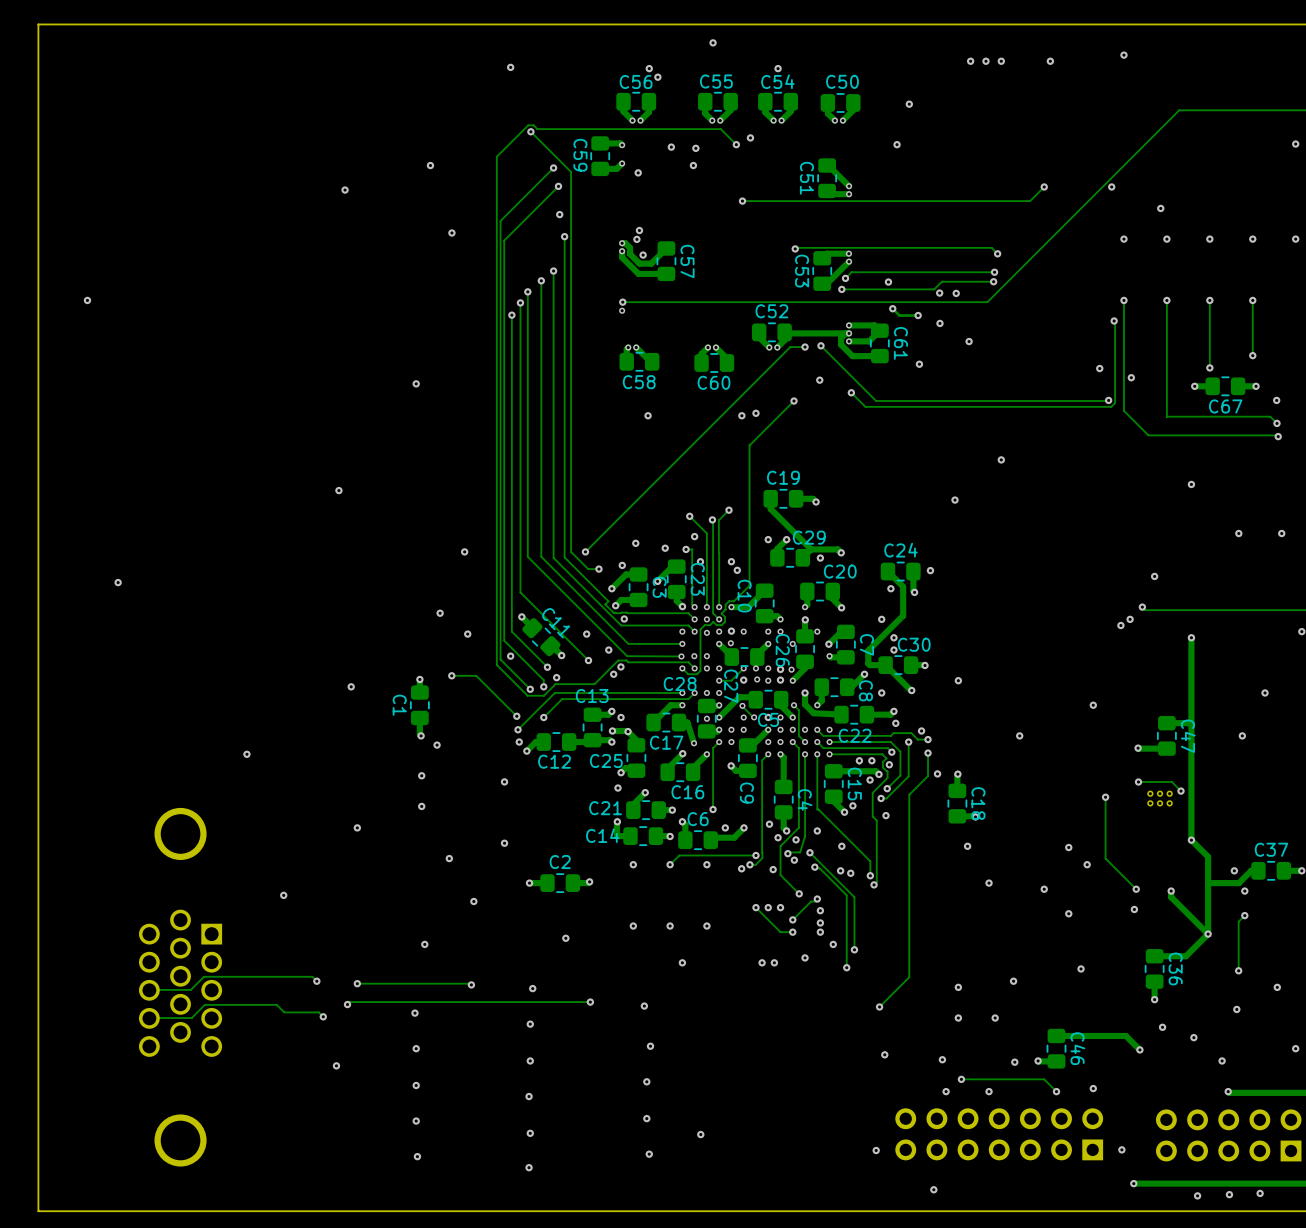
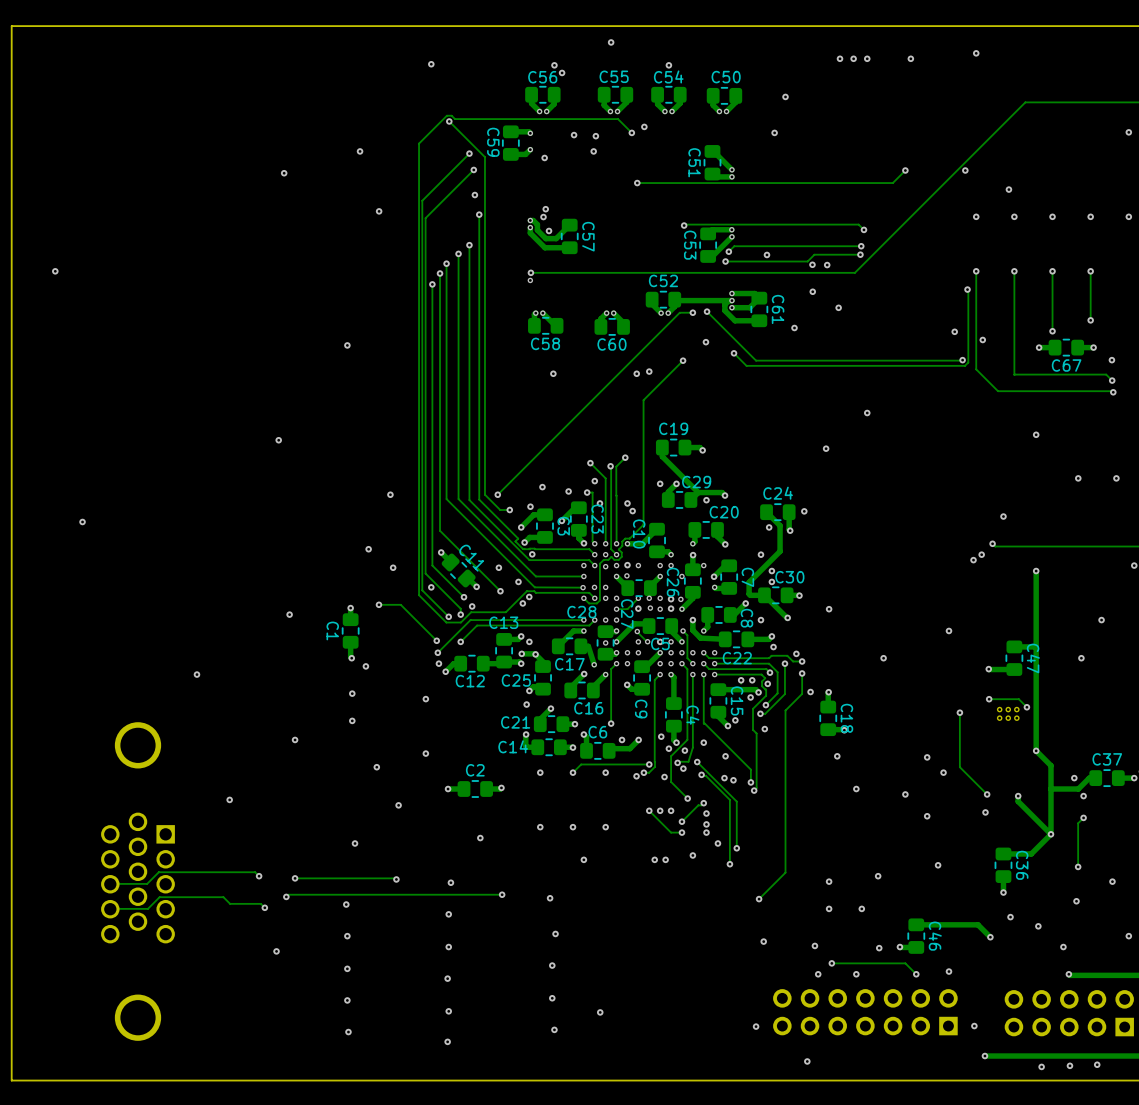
track: (892, 308) (899, 315) (918, 315) -> none
via: (892, 308) -> none
via: (918, 315) -> none

